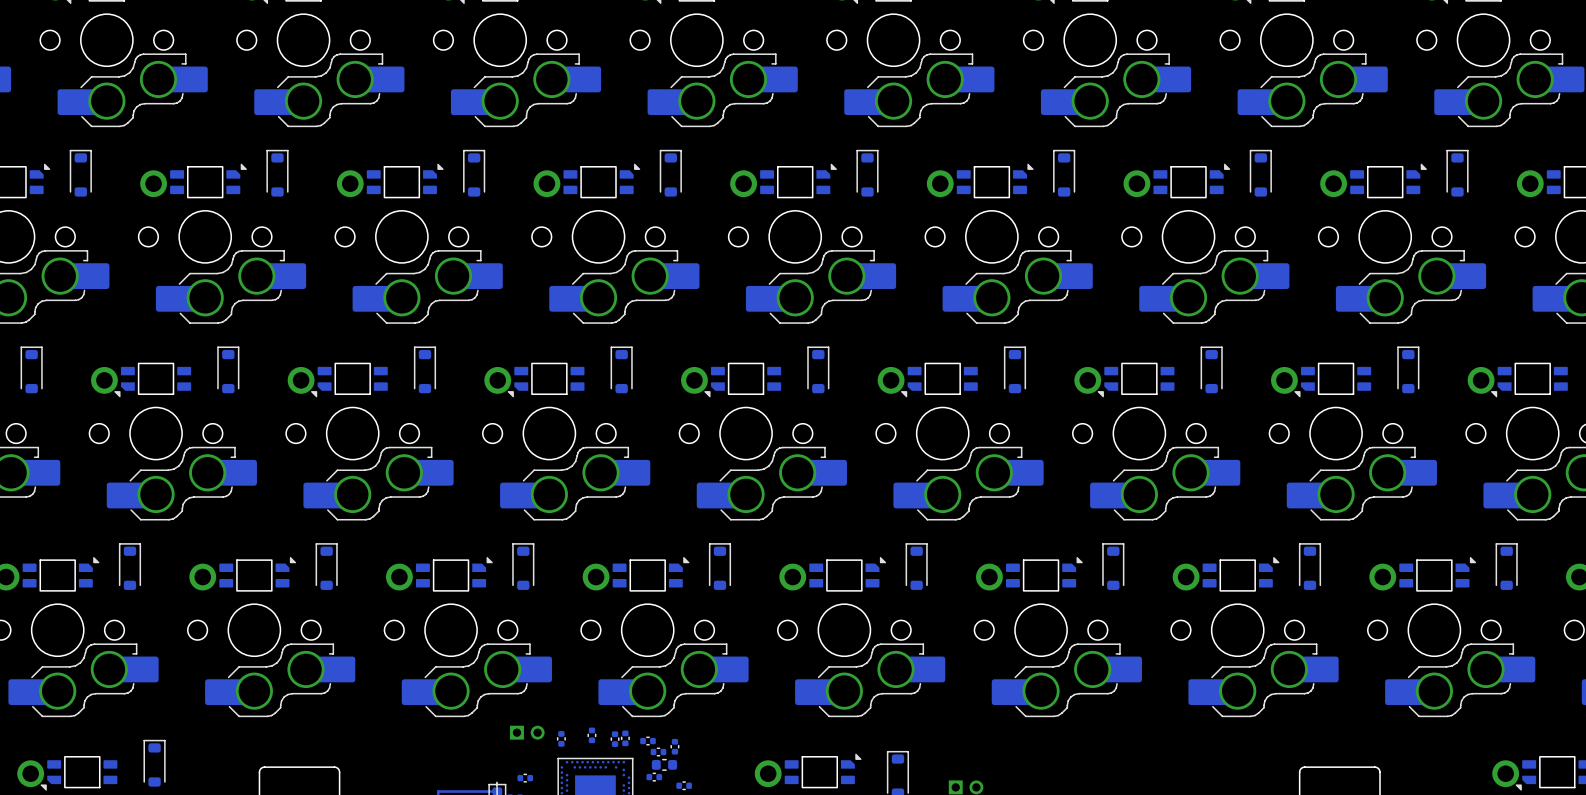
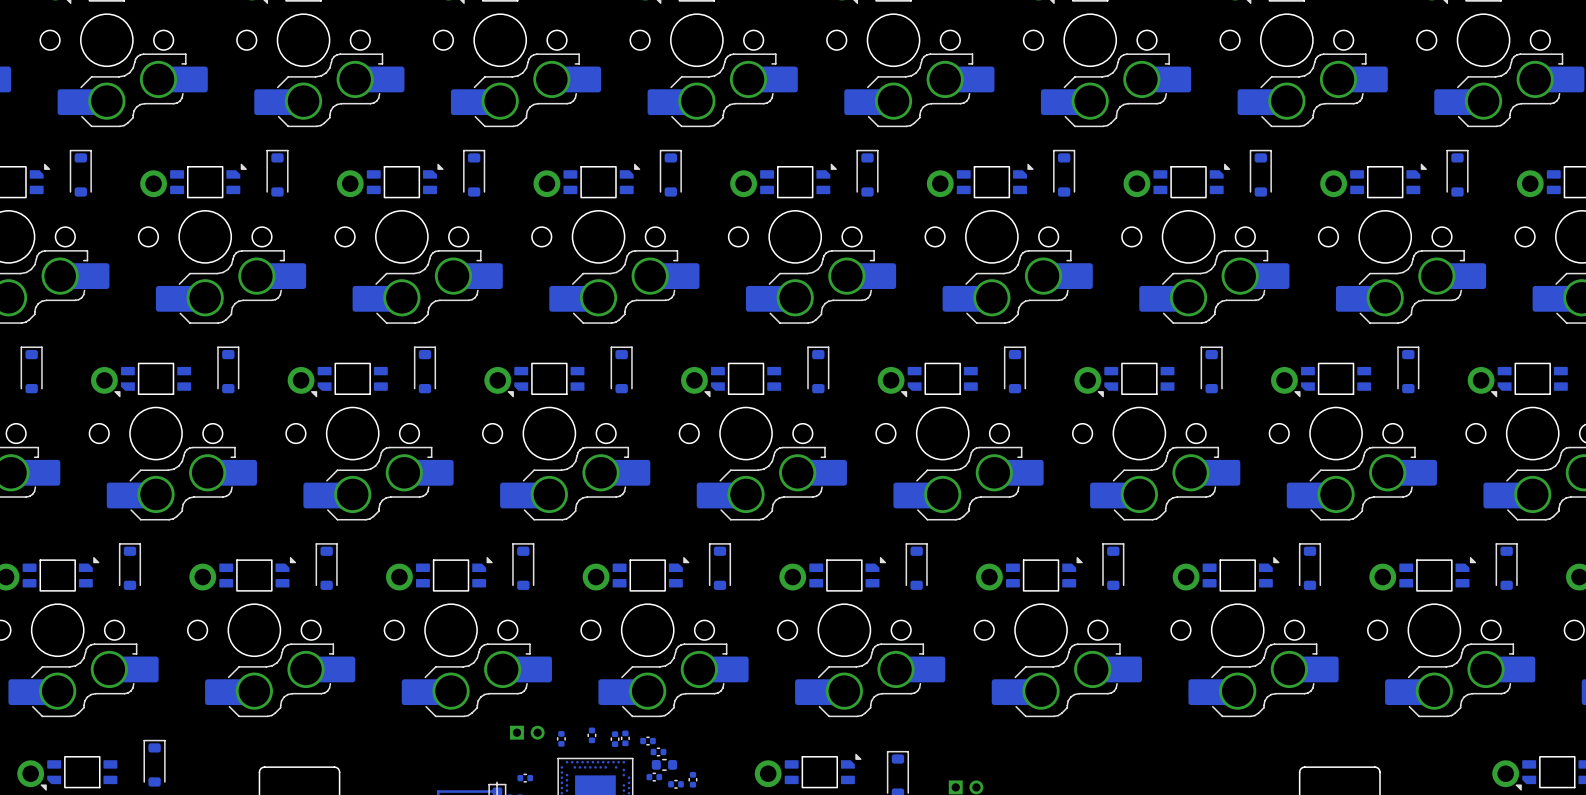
part: (674, 746) -> none
part: none -> (692, 779)
part: none -> (675, 784)
part: (684, 785) -> none

